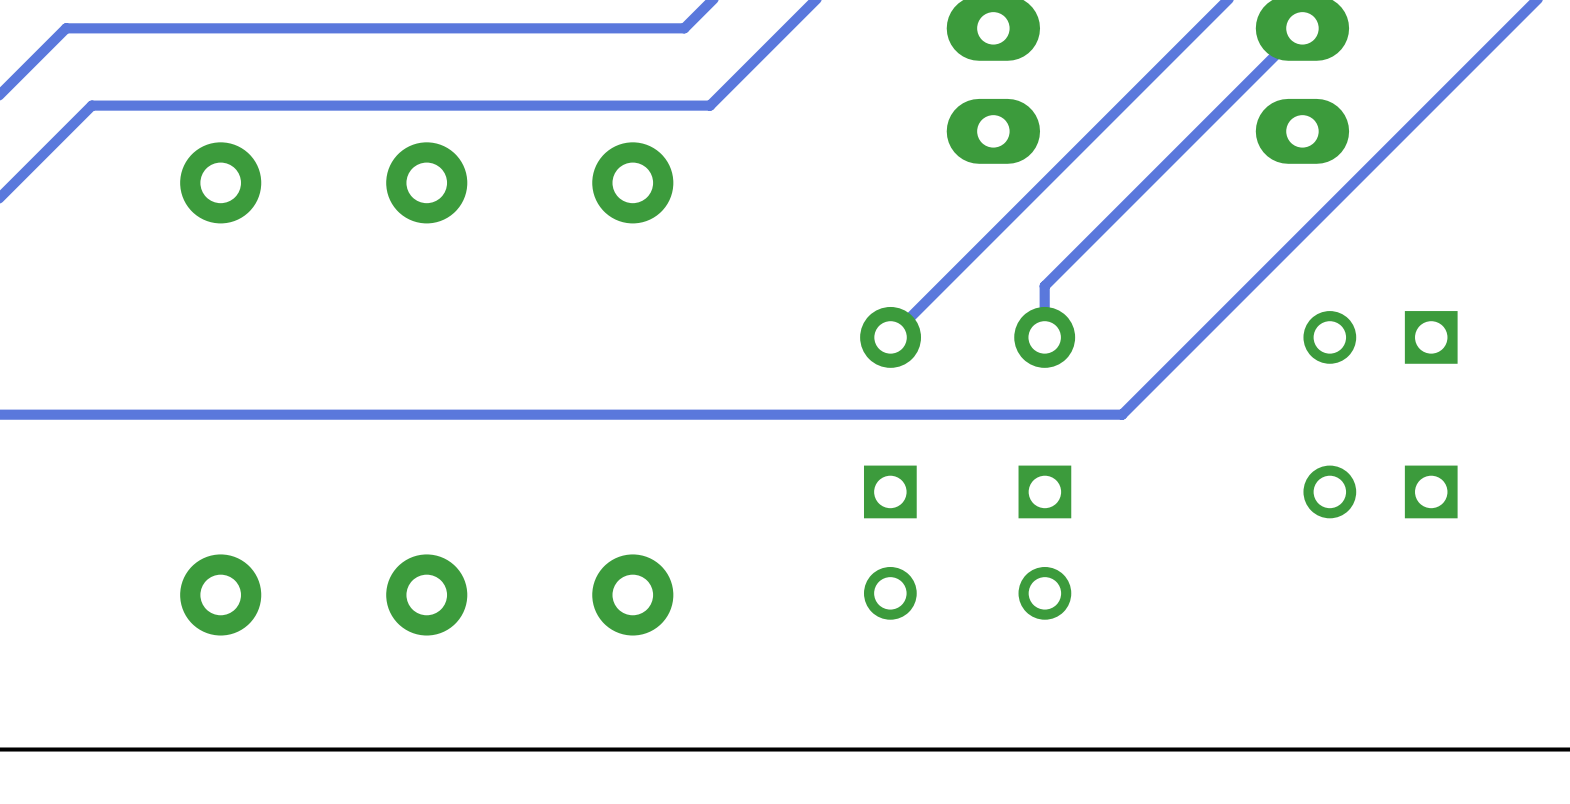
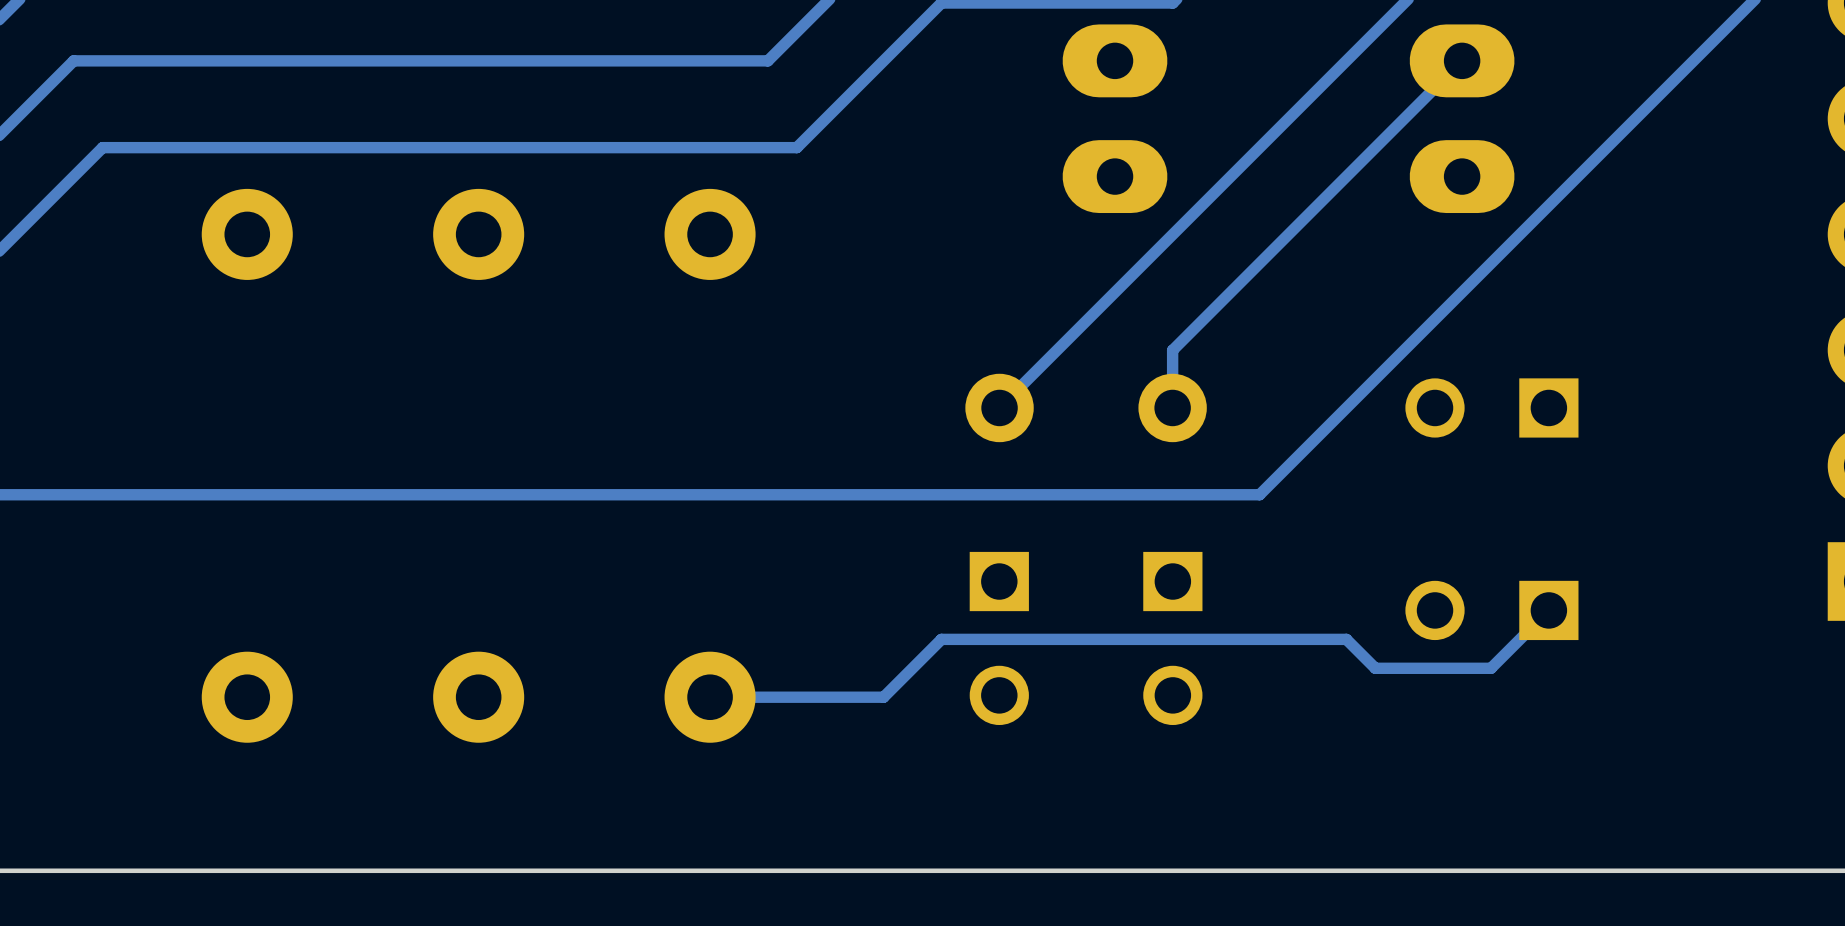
part position: (1380, 337) -> (1491, 407)
part position: (1380, 491) -> (1491, 610)
track: none -> (1548, 610) (1491, 668) (1375, 668) (1346, 639) (941, 639) (883, 697) (710, 697)

